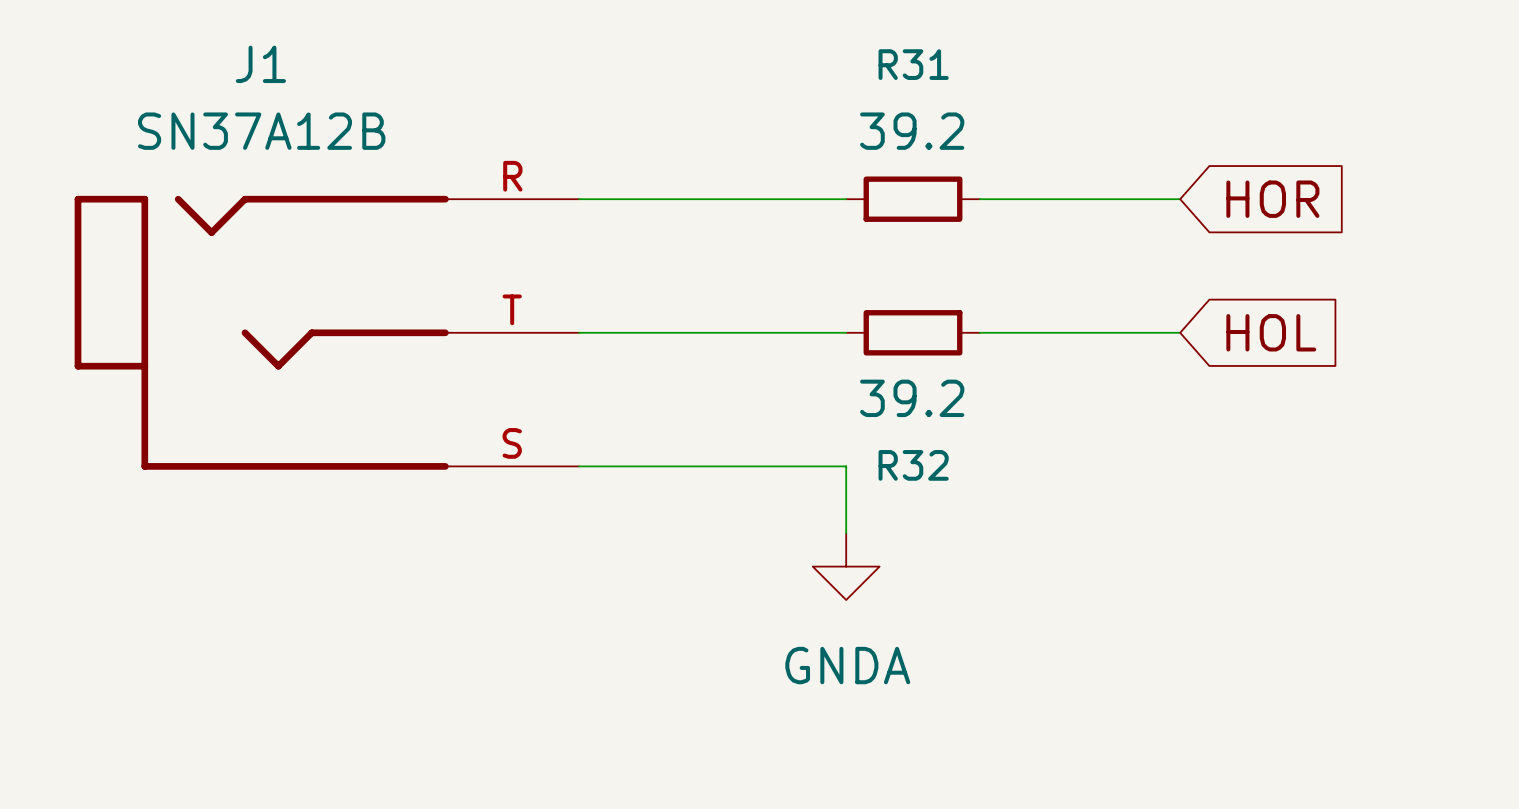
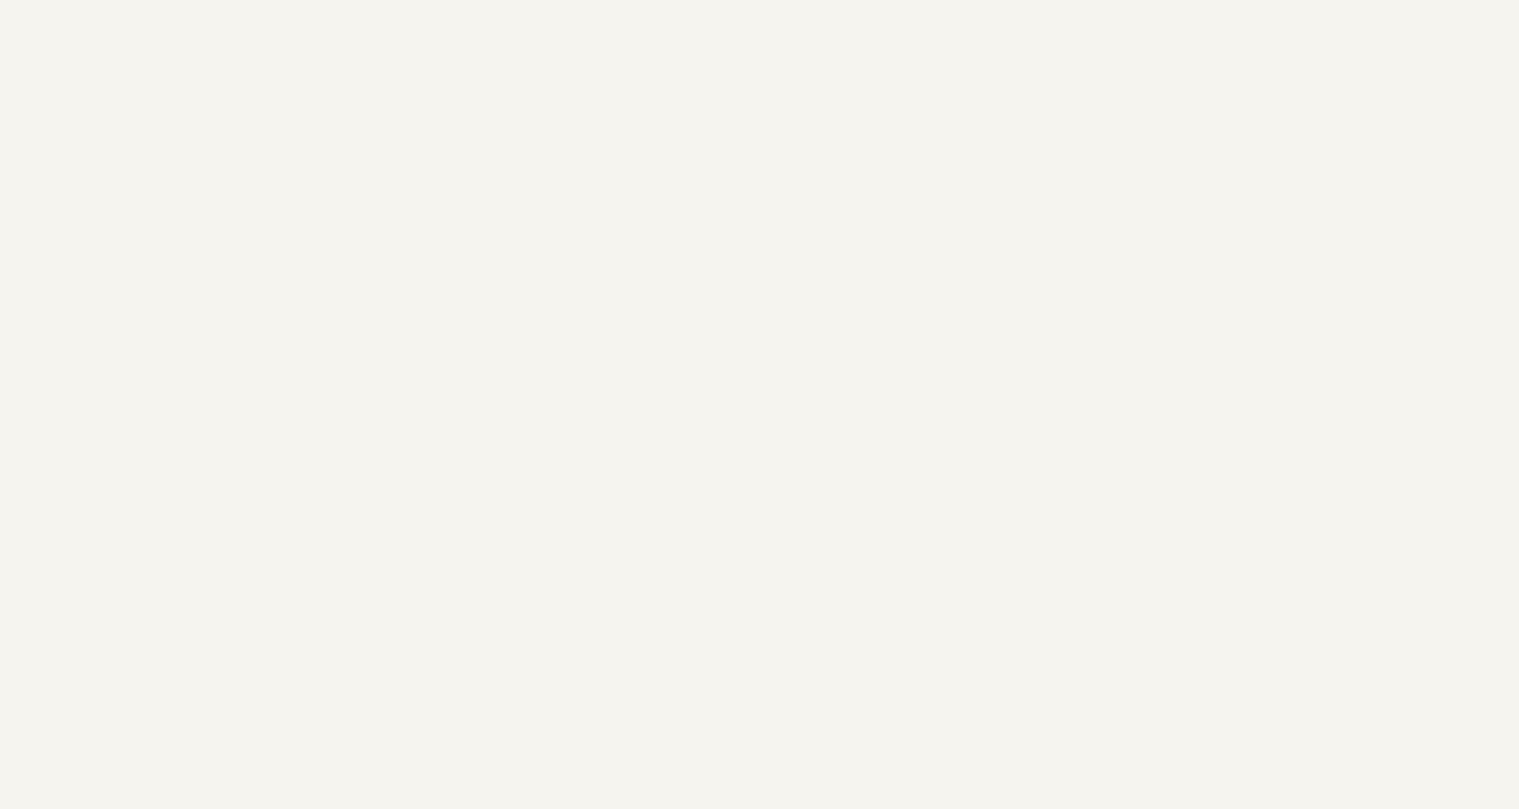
wire: (579, 199) (846, 199) -> none
R31: 39.2 (912, 199) -> none
wire: (979, 199) (1180, 199) -> none
global label: HOR (1272, 199) -> none
J1: SN37A12B (326, 332) -> none
wire: (579, 332) (846, 332) -> none
R32: 39.2 (912, 332) -> none
wire: (979, 332) (1180, 332) -> none
global label: HOL (1271, 332) -> none
wire: (579, 466) (846, 466) (846, 533) -> none
power symbol: GNDA (846, 566) -> none

